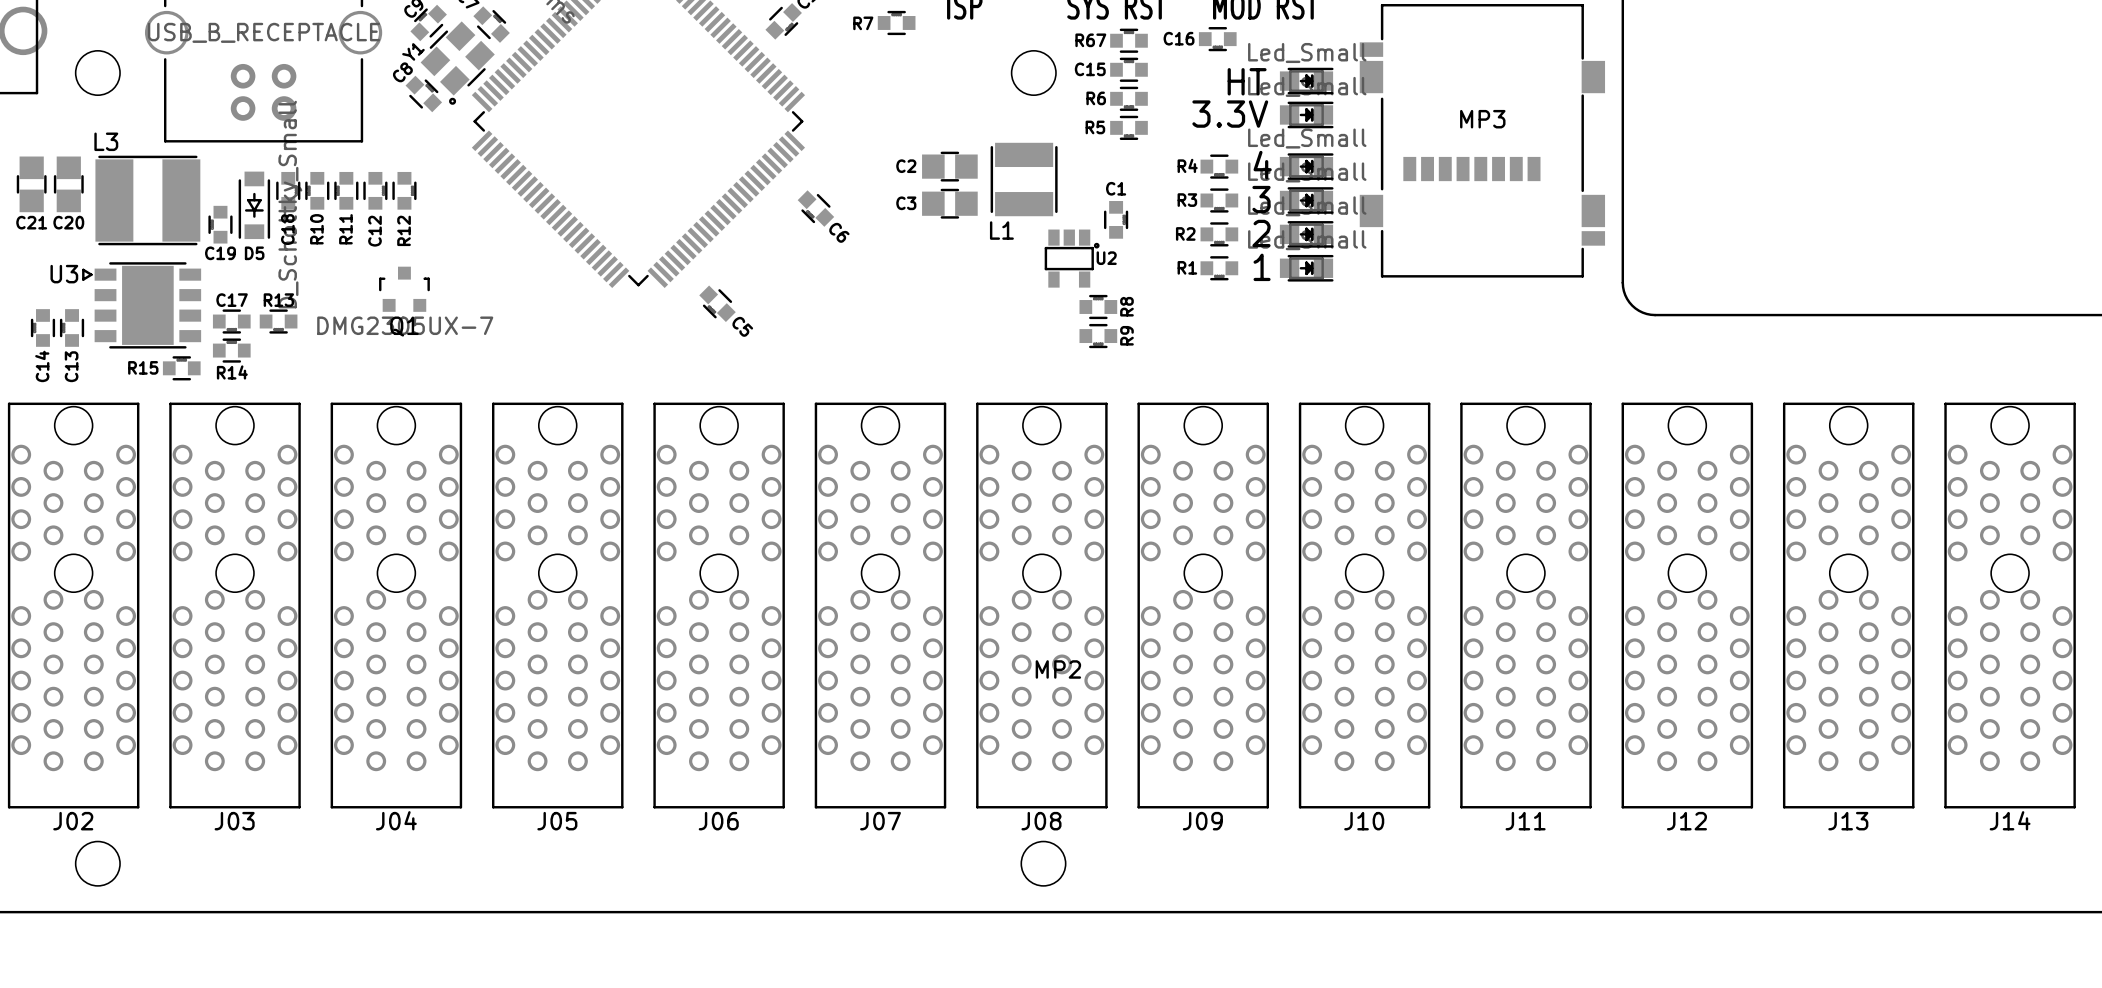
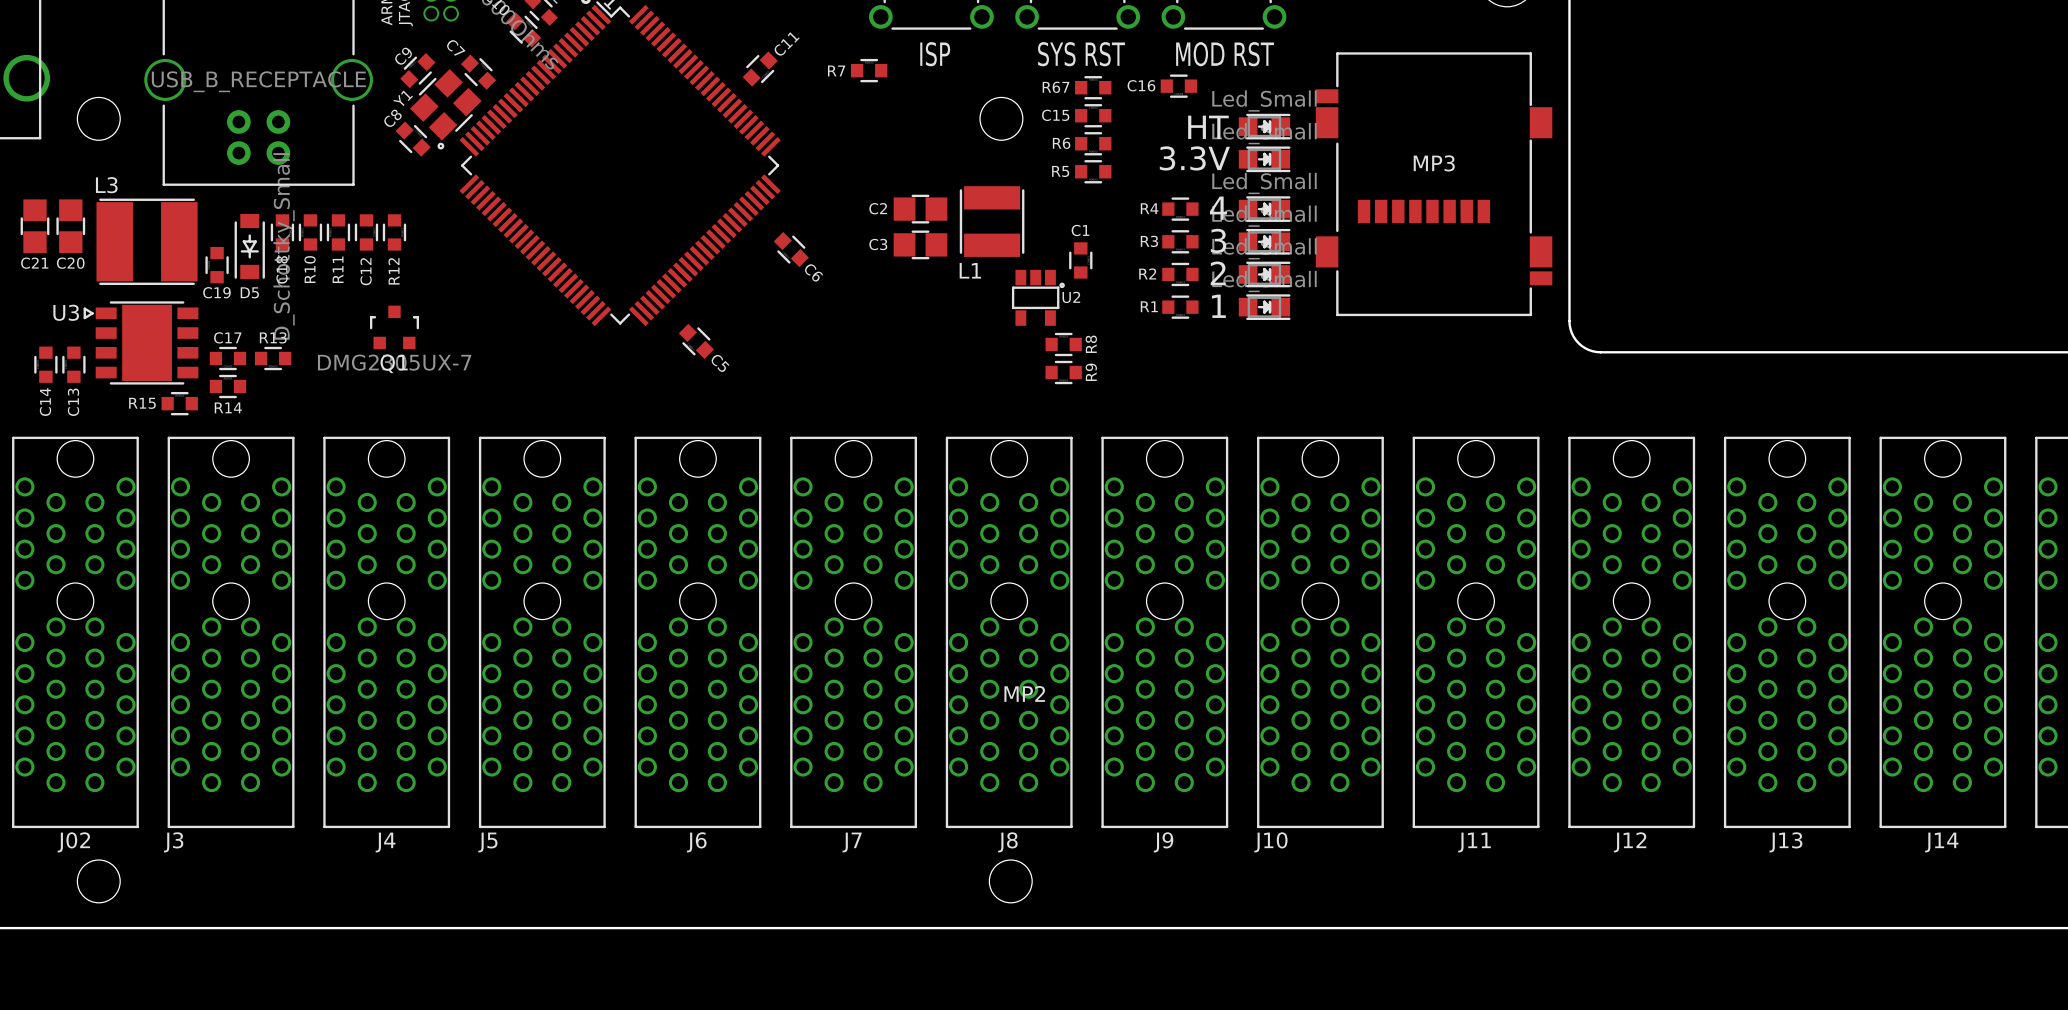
J04 name: J04 (396, 820) -> J4 (385, 842)
J03 name: J03 (234, 821) -> J3 (173, 842)
J05 name: J05 (557, 821) -> J5 (487, 842)
J06 name: J06 (718, 821) -> J6 (696, 842)
J07 name: J07 (880, 821) -> J7 (852, 842)
J08 name: J08 (1041, 821) -> J8 (1007, 842)
J09 name: J09 (1202, 821) -> J9 (1163, 842)
J10 name position: J10 (1364, 821) -> J10 (1270, 842)

